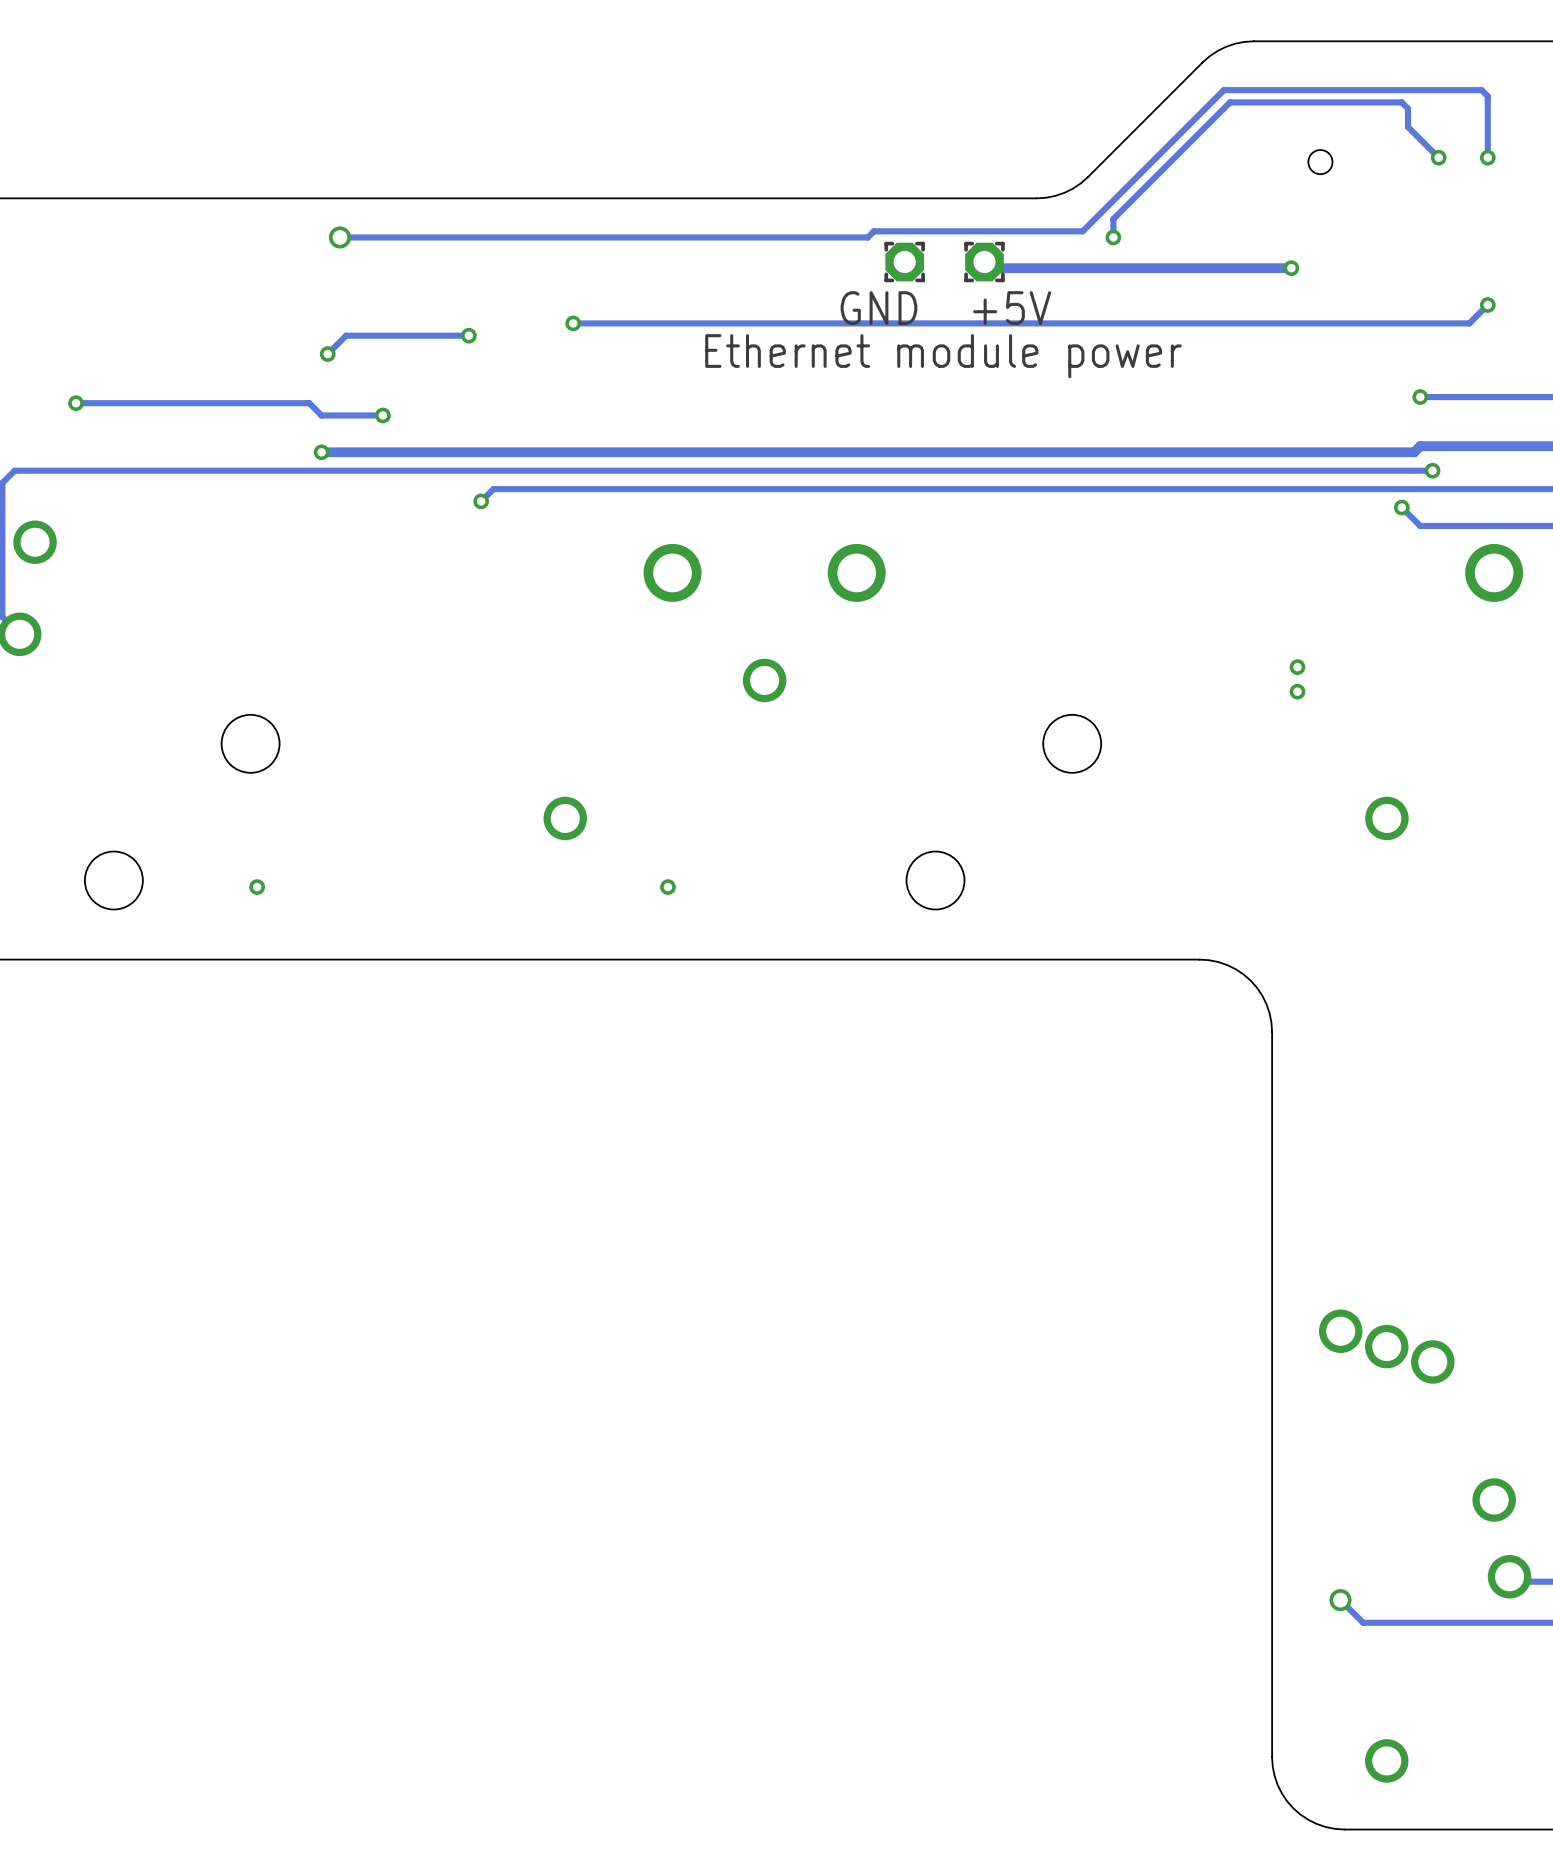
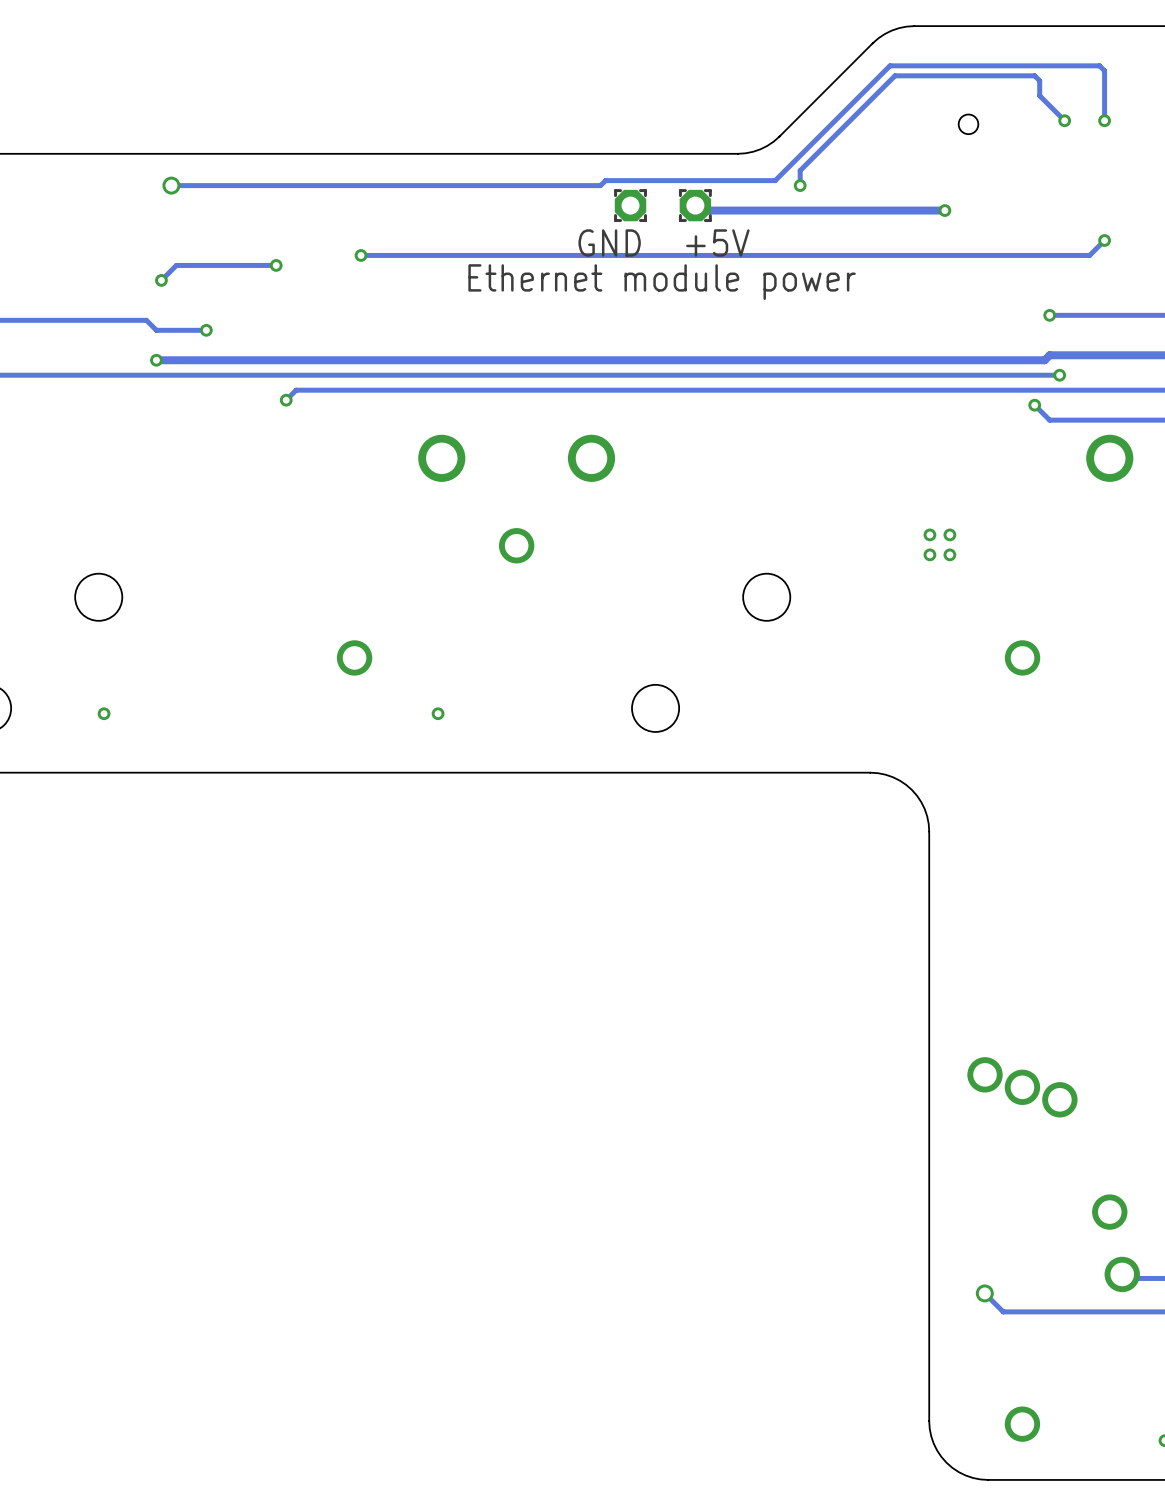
via: none -> (929, 534)
via: none -> (929, 554)

